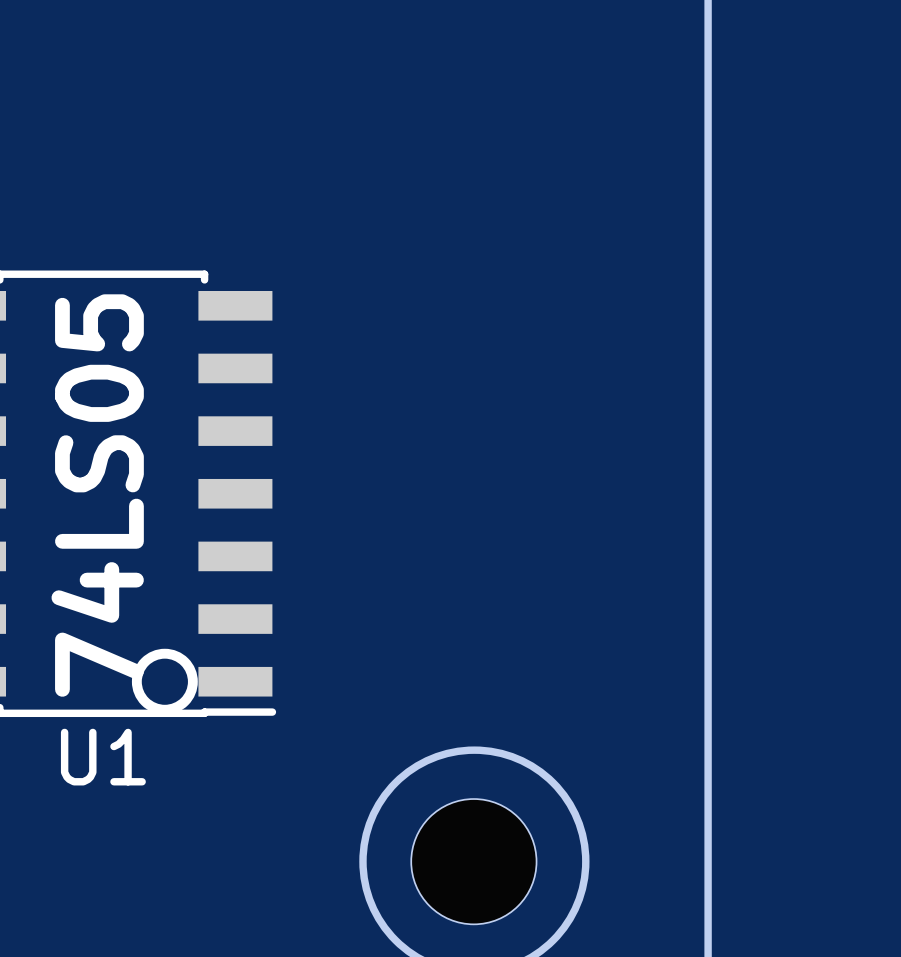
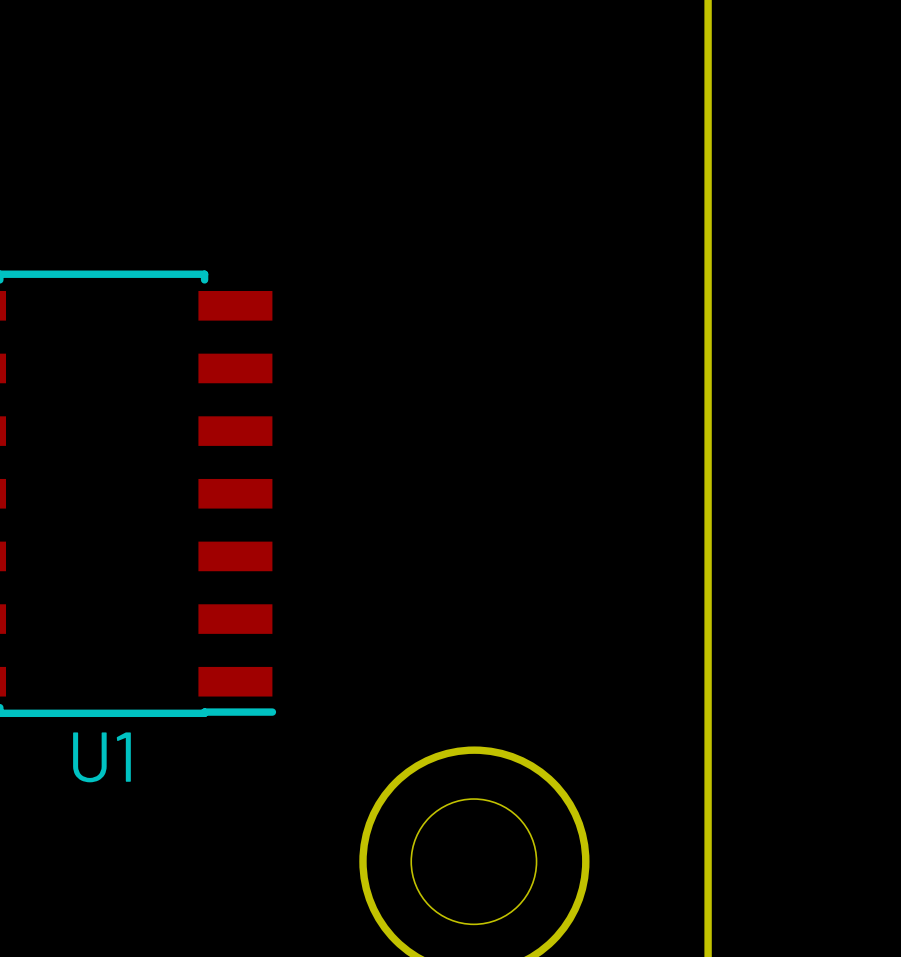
text: 74LS05 (97, 495) -> none
drawing: [131, 648, 198, 715] -> none

